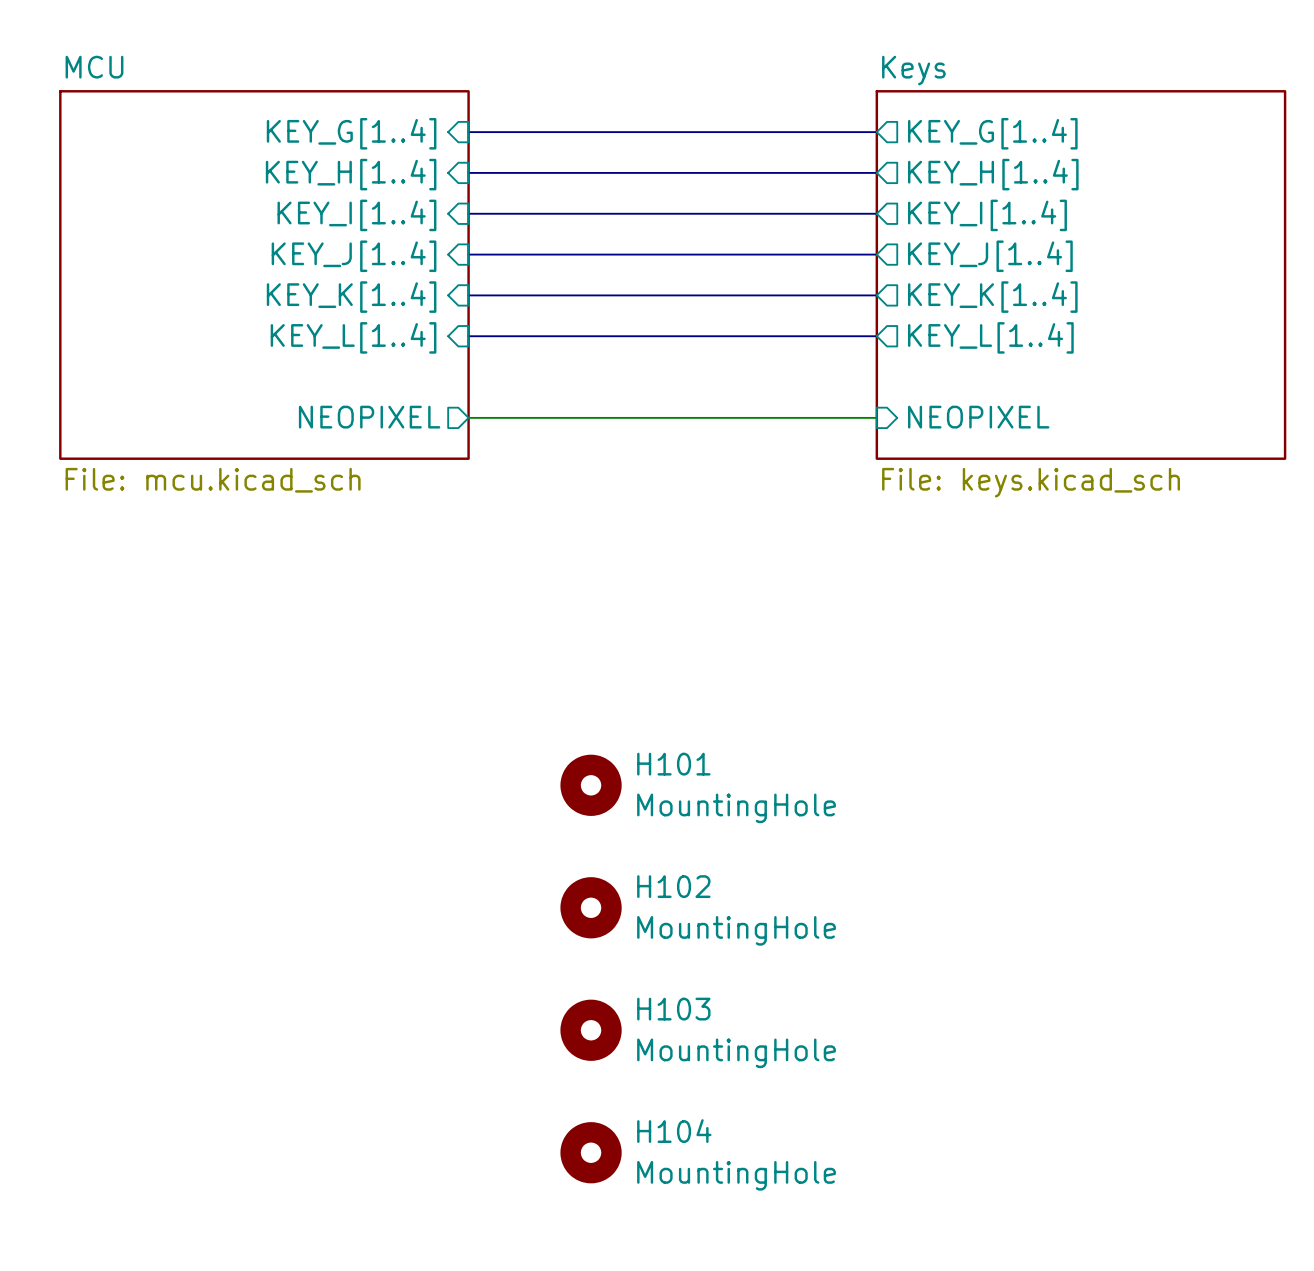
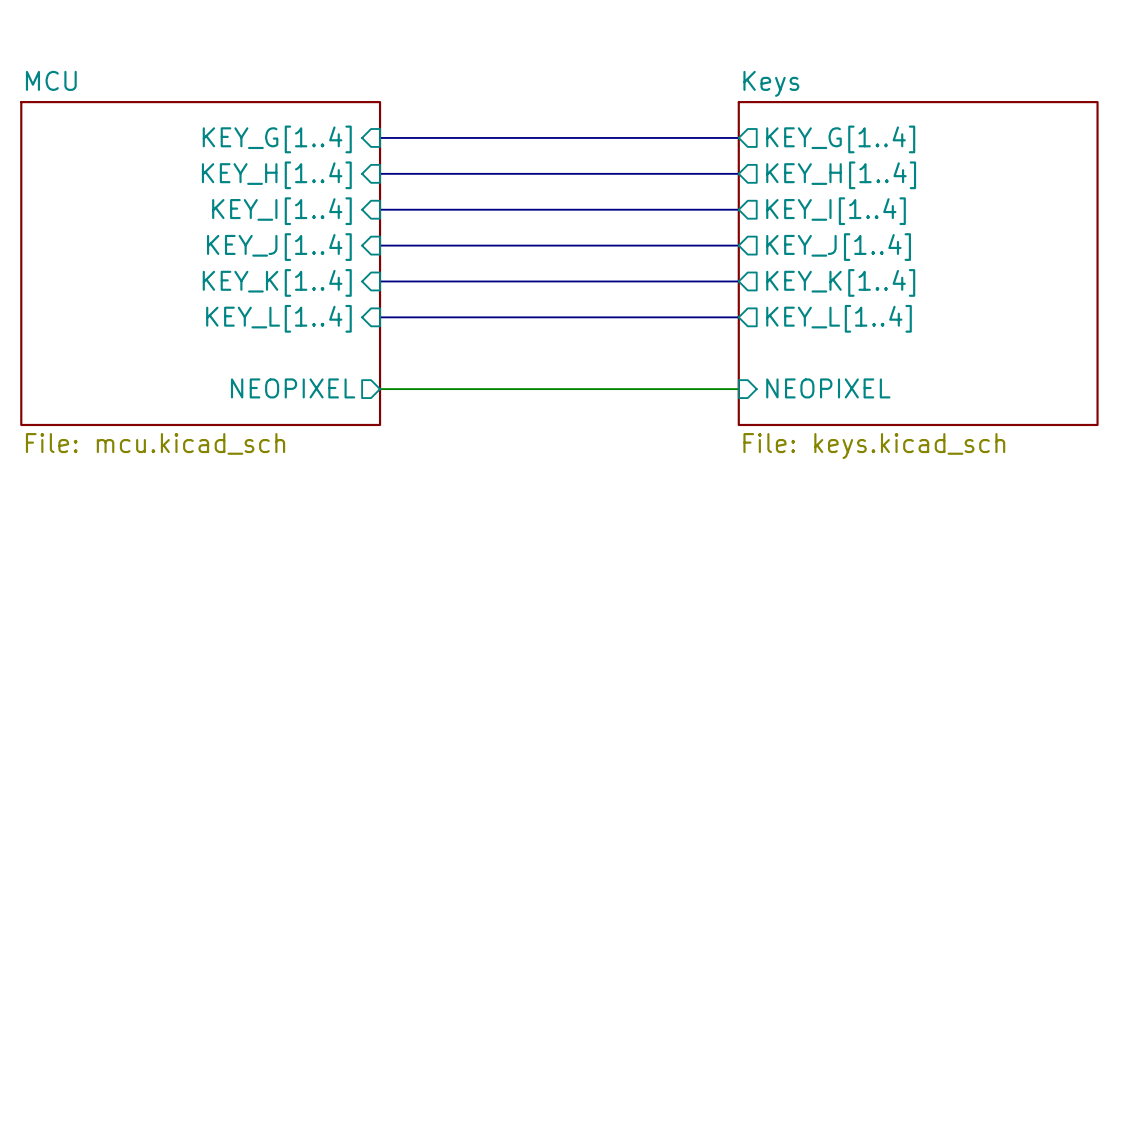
H101: MountingHole (591, 785) -> none
H102: MountingHole (591, 907) -> none
H103: MountingHole (591, 1030) -> none
H104: MountingHole (591, 1152) -> none

